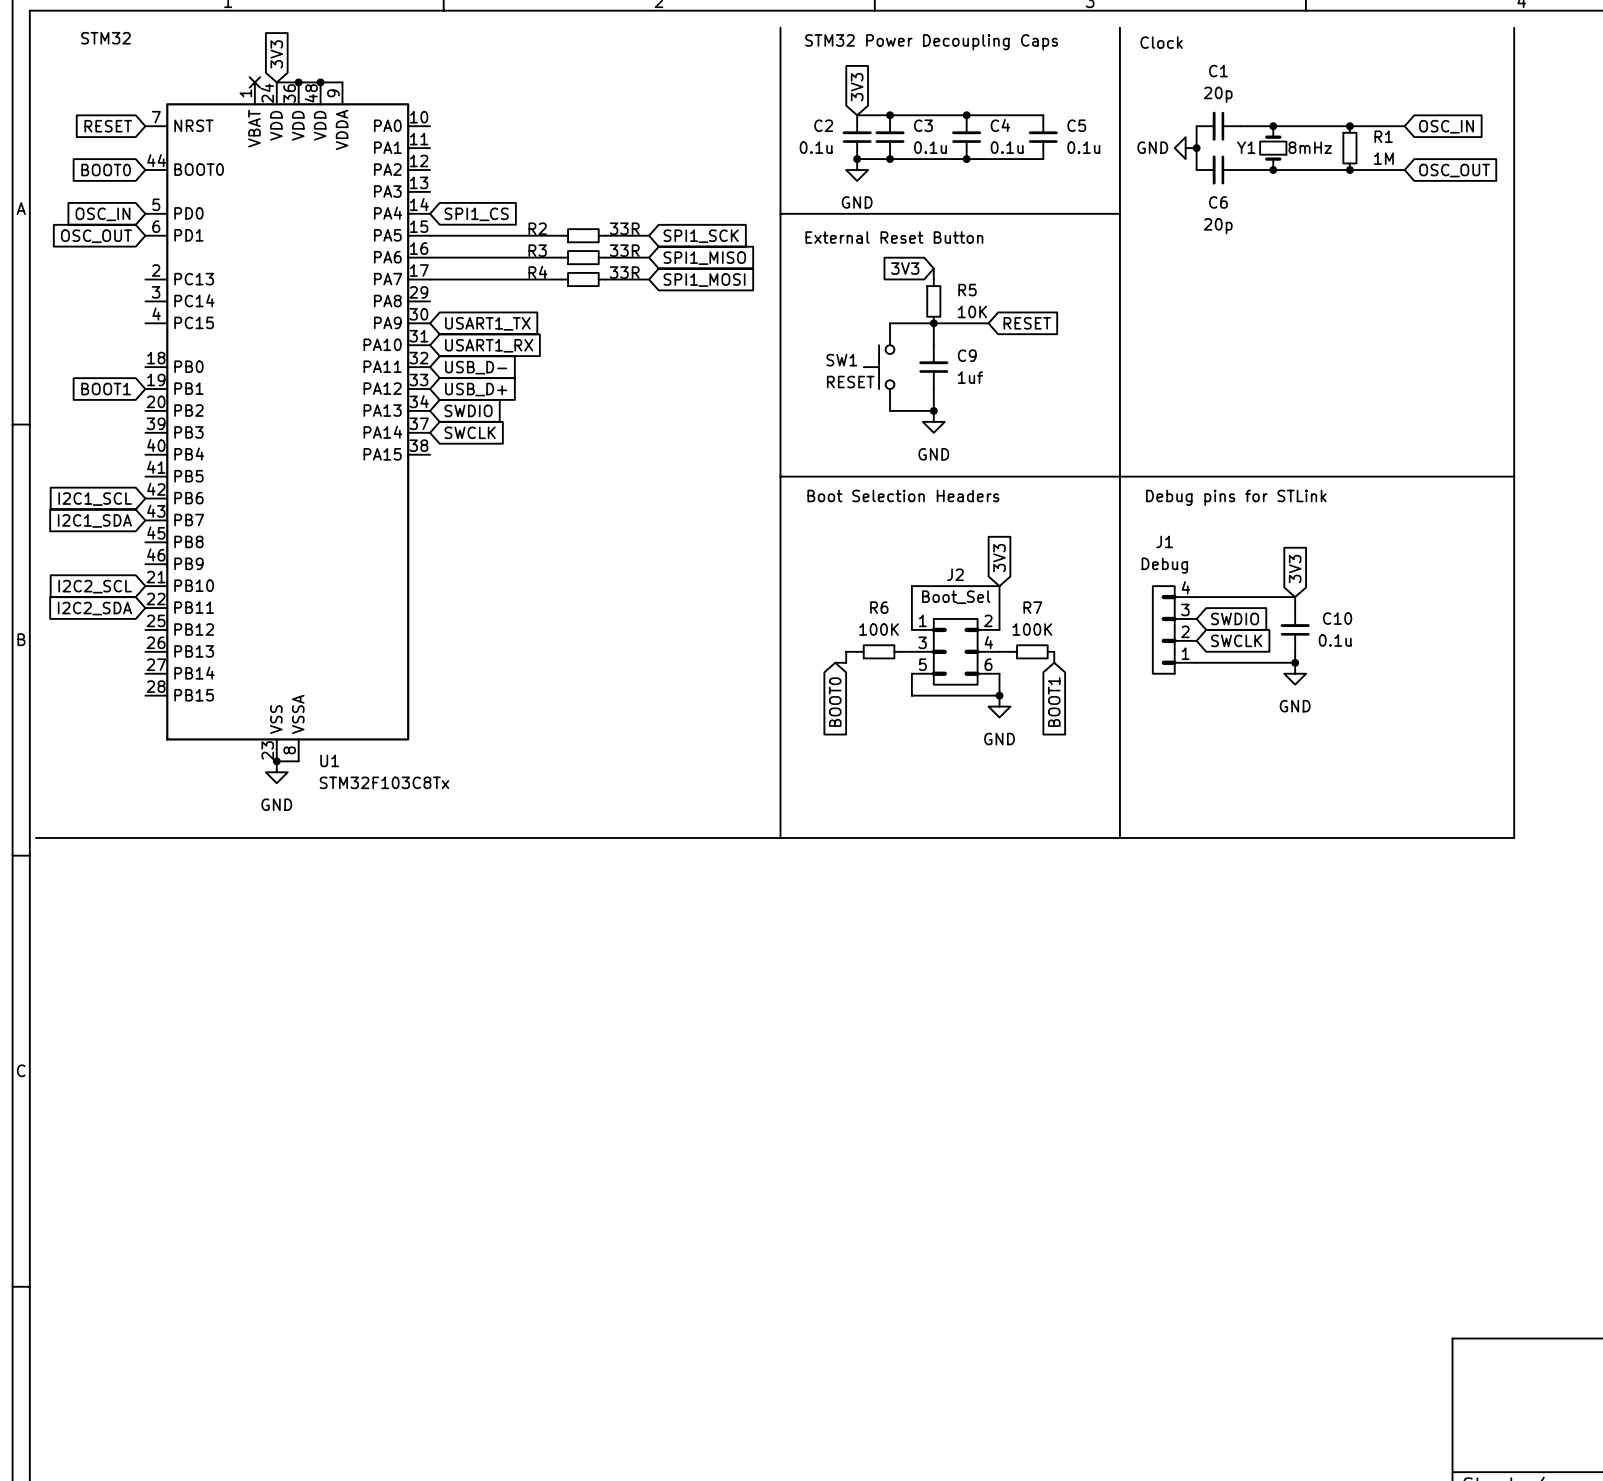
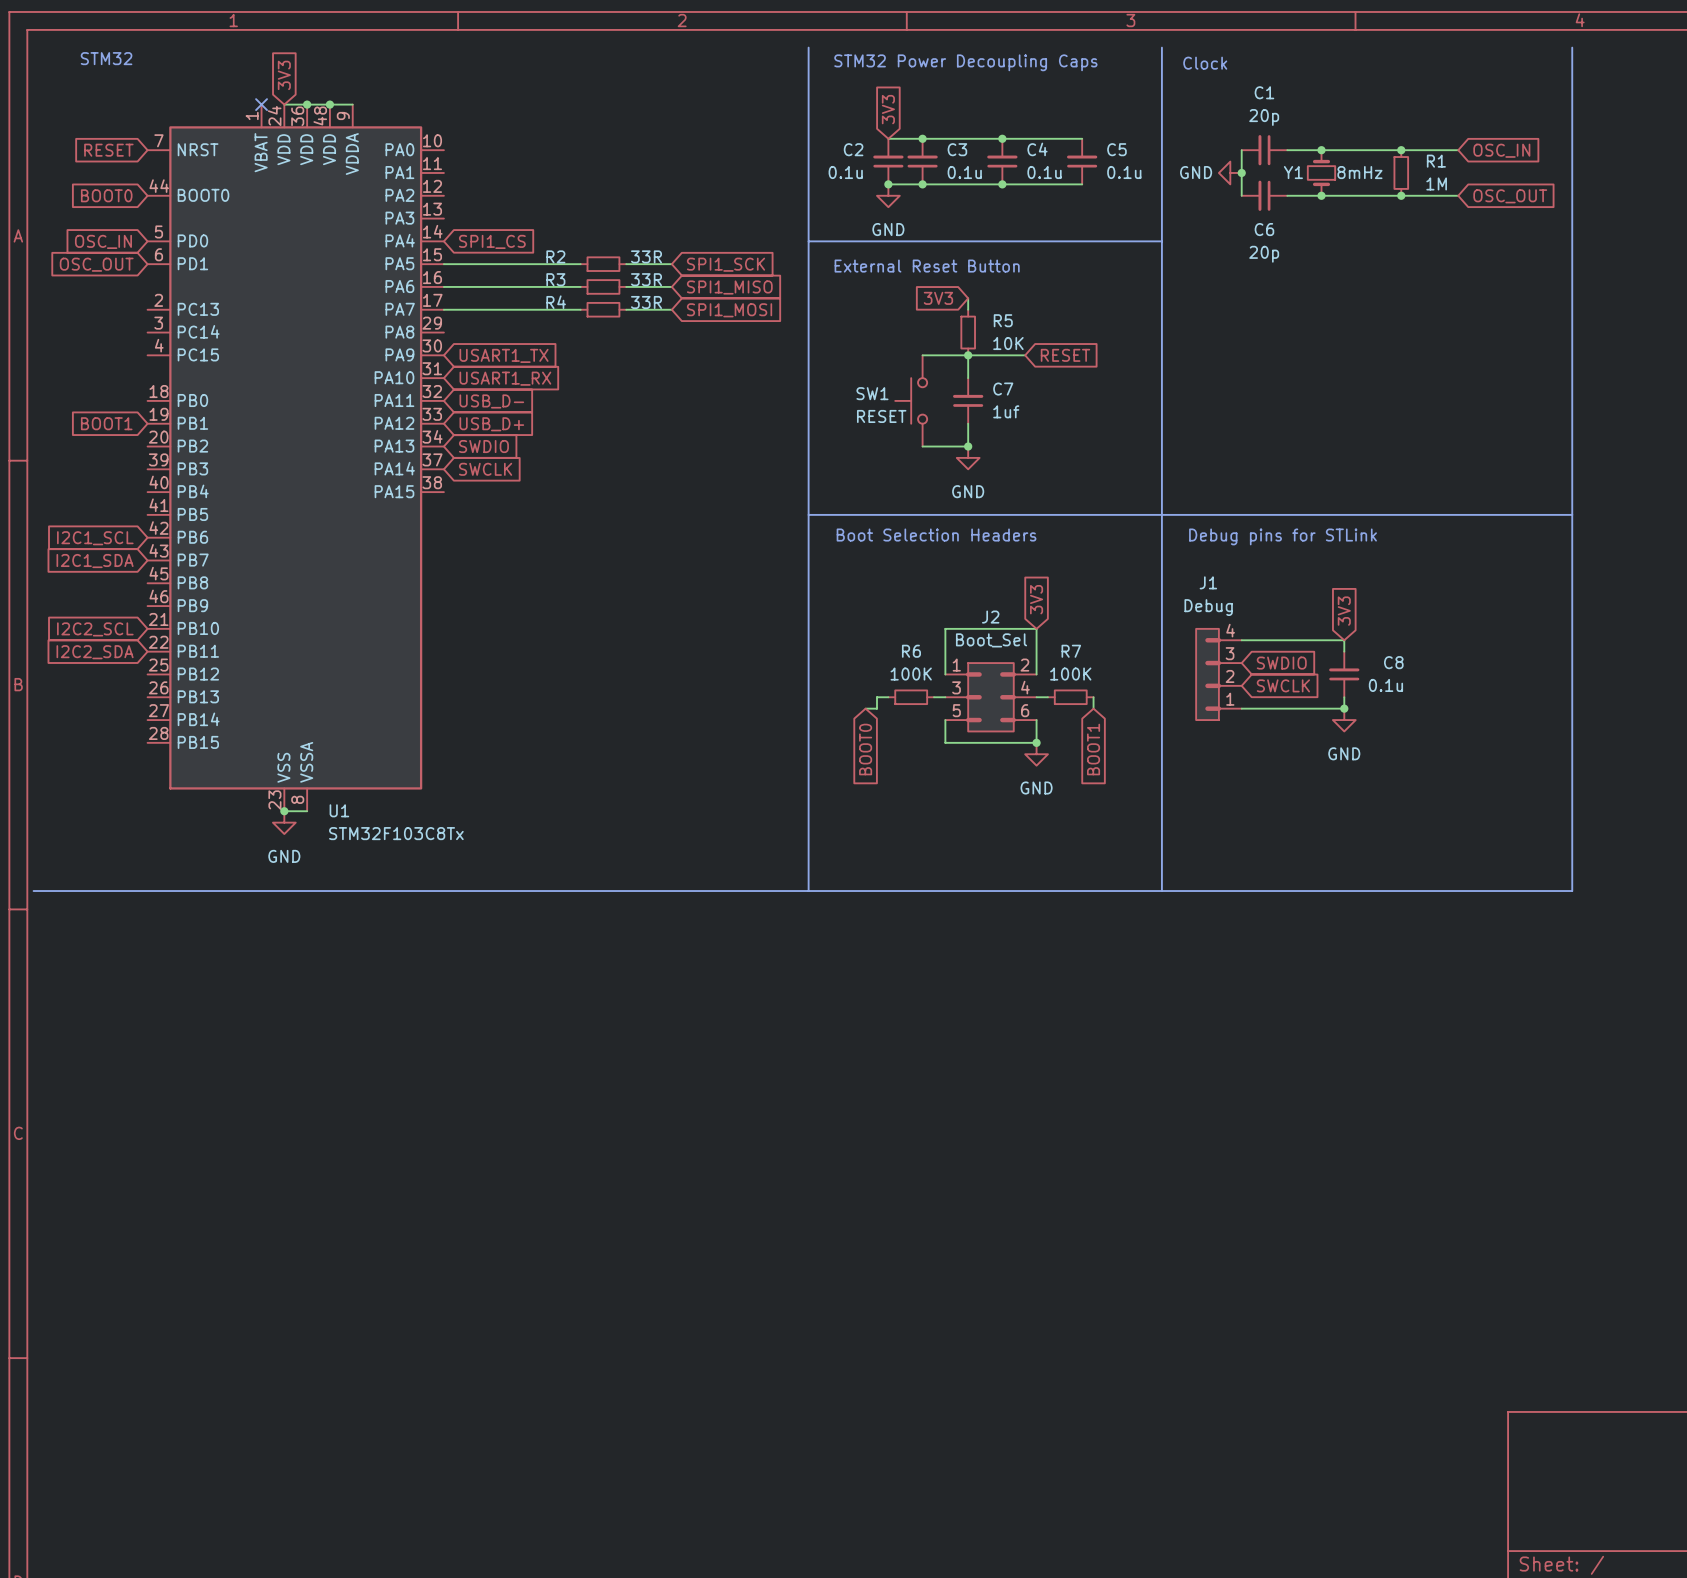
C9 name: C9 (967, 355) -> C7 (1003, 389)
C10 name: C10 (1337, 618) -> C8 (1393, 662)

